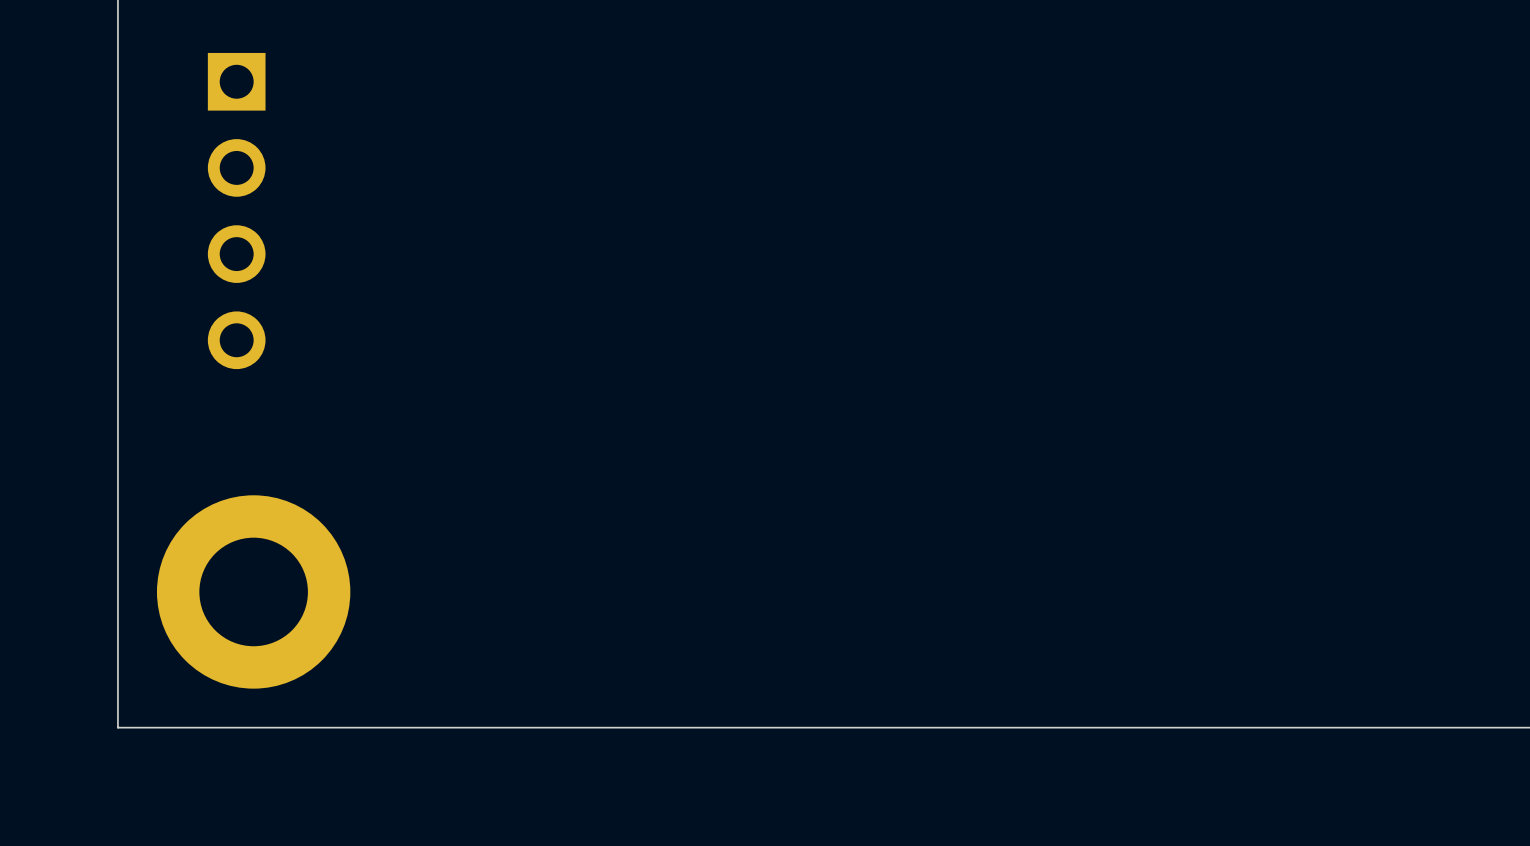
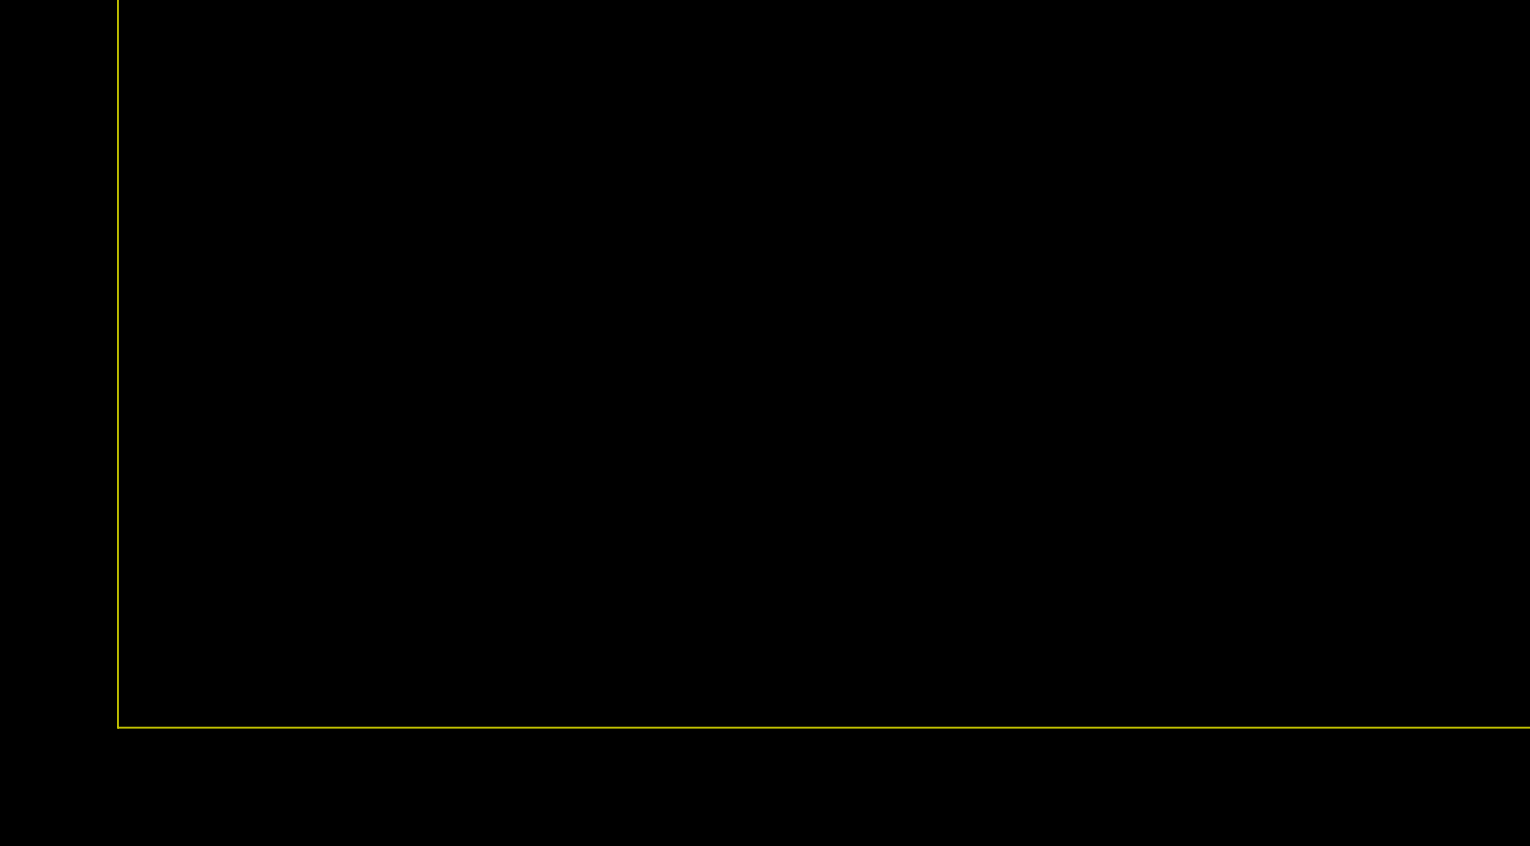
part: (236, 211) -> none
part: (253, 591) -> none

